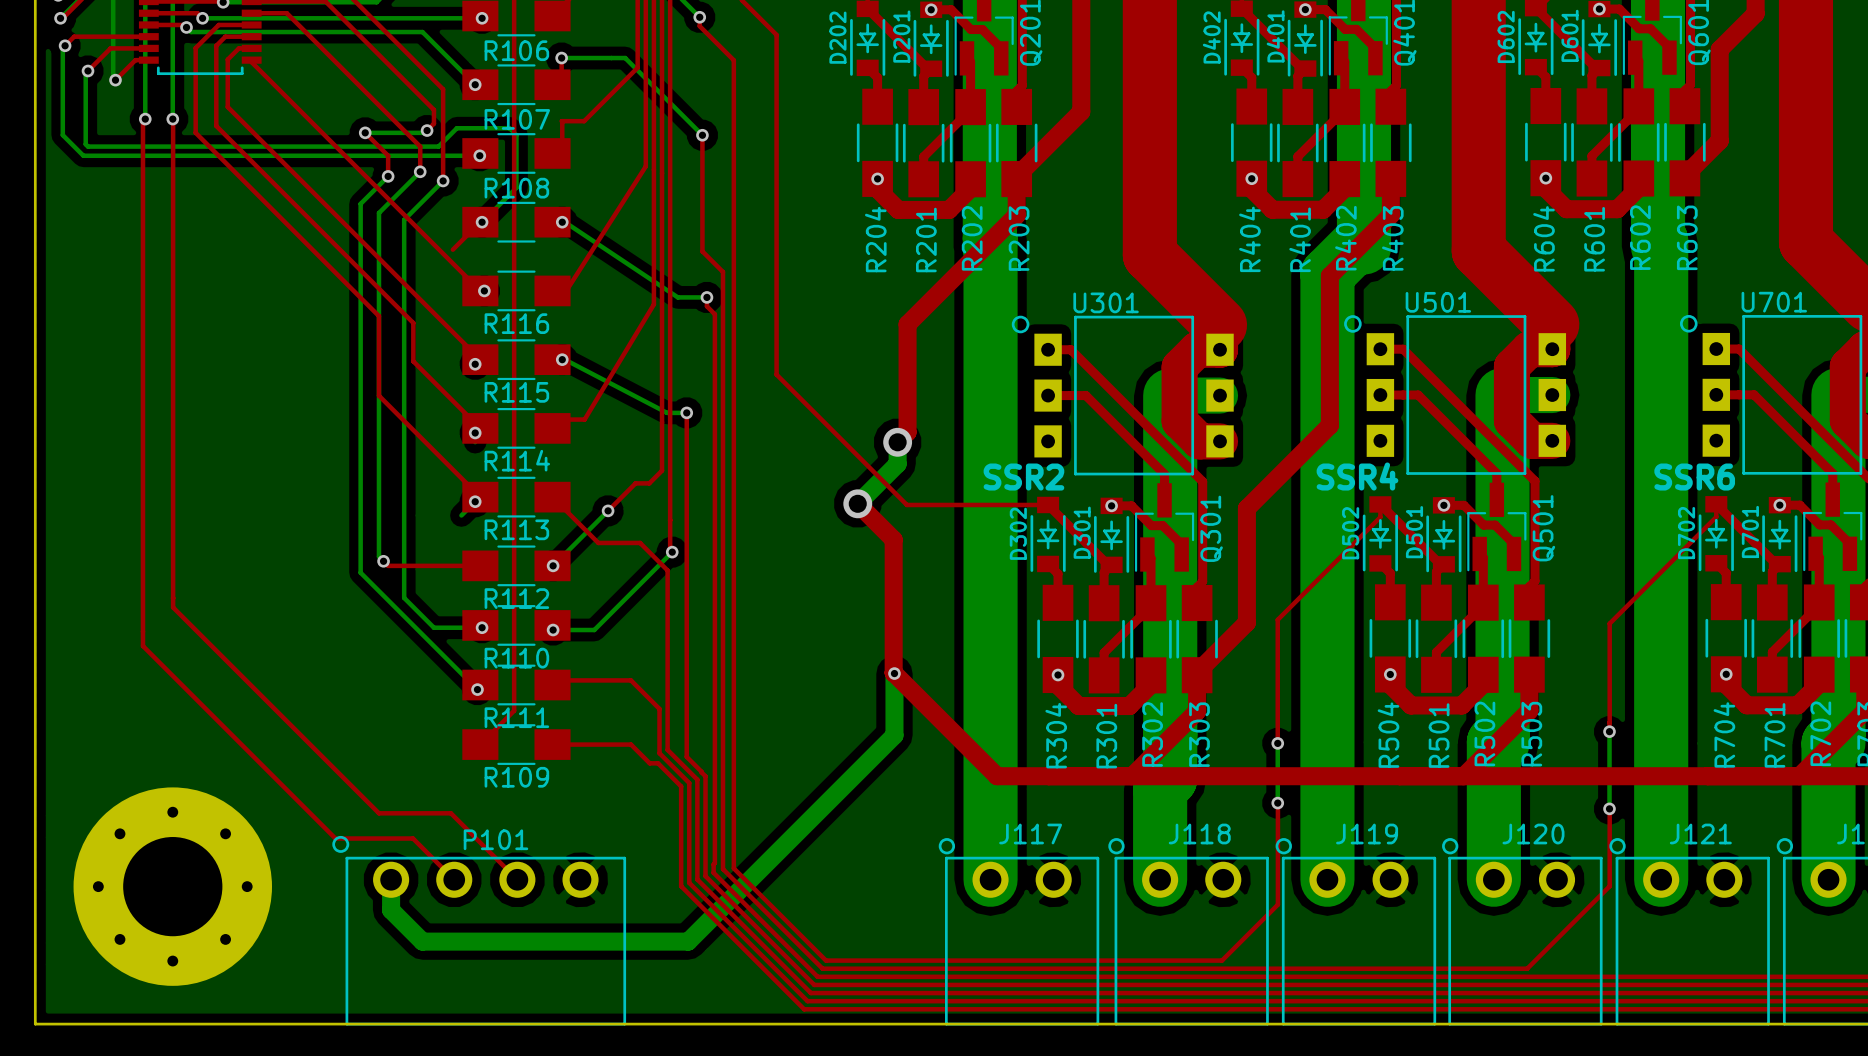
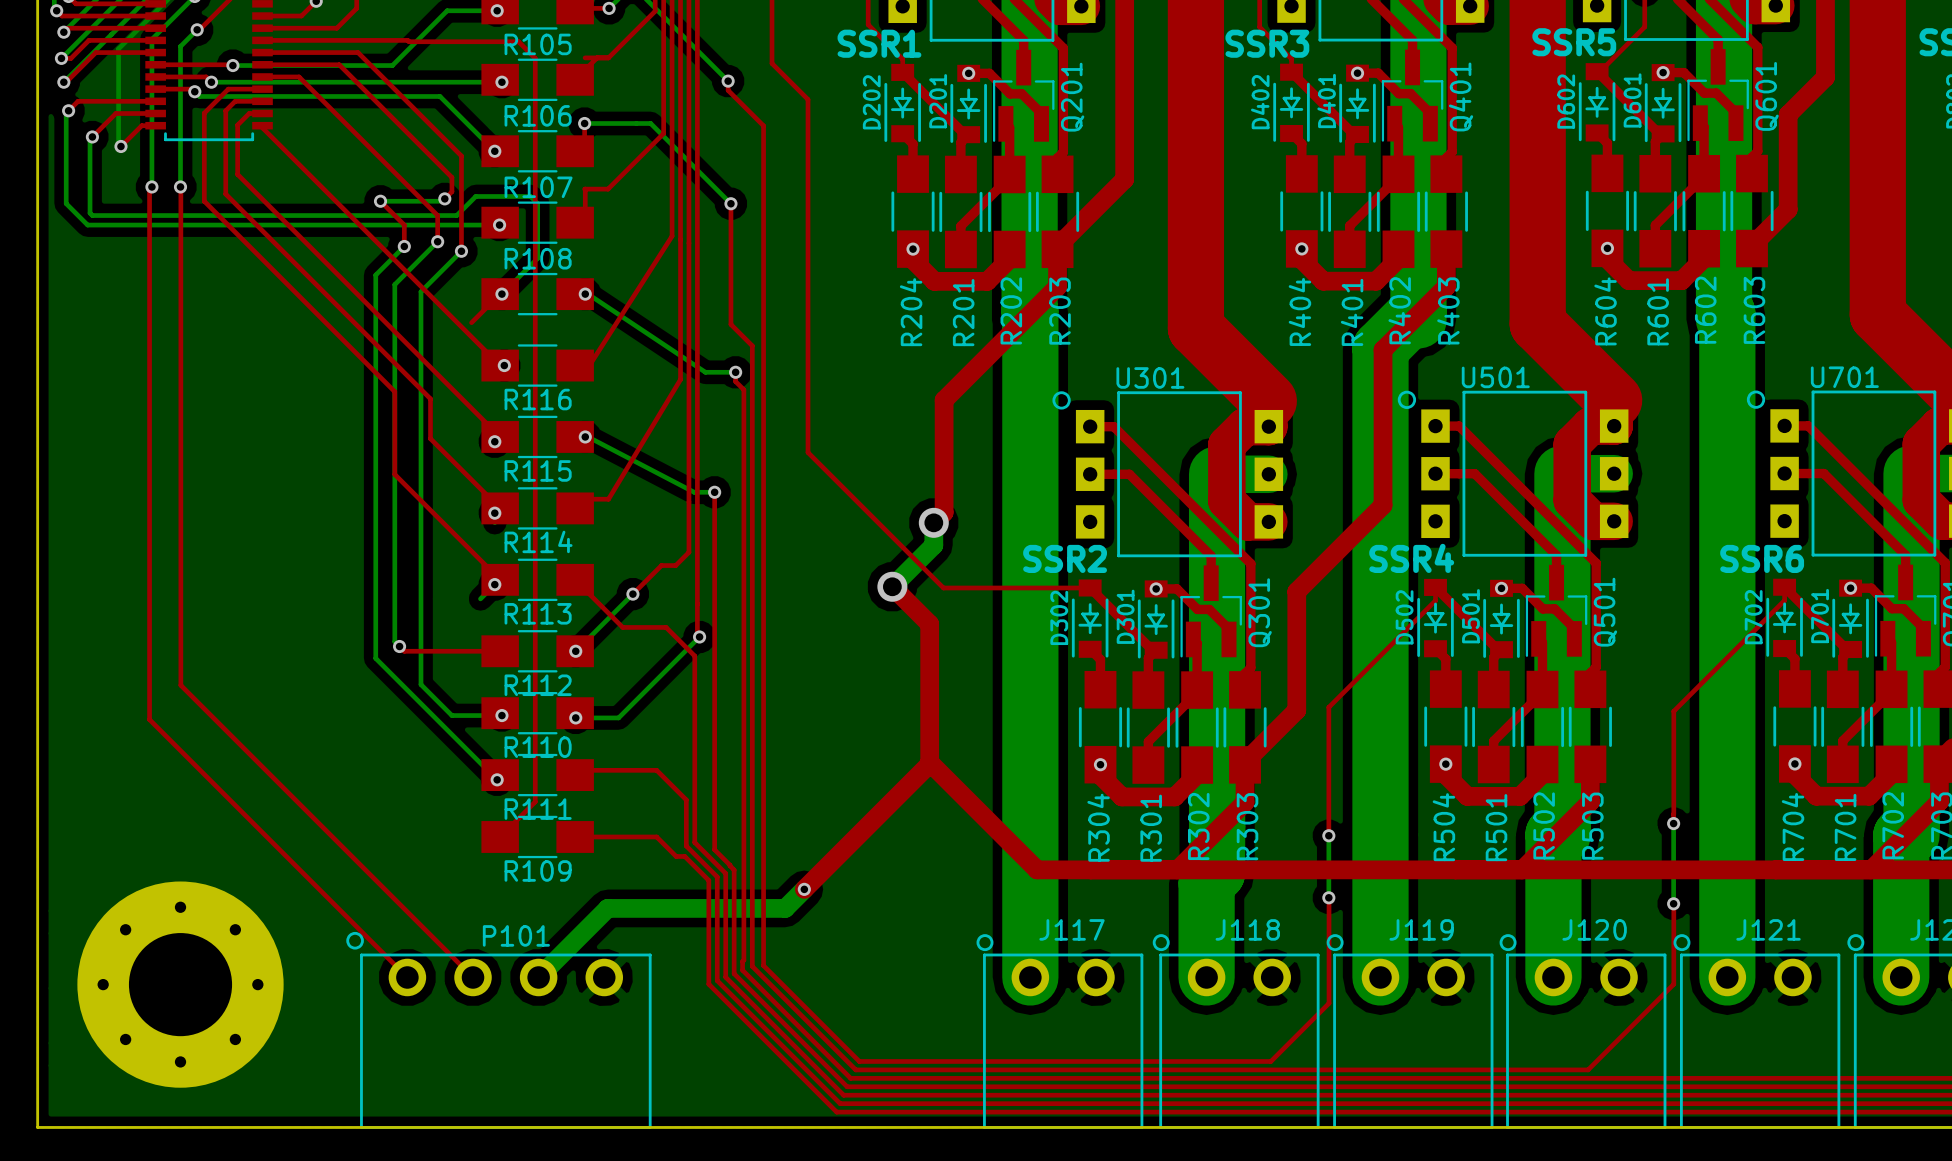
top track: (173, 598) (173, 607) (378, 813) (450, 813) (517, 879) -> none
top track: (142, 631) (142, 646) (335, 838) (412, 838) -> (180, 685) (430, 934)
top track: none -> (149, 719) (407, 977)
top track: none -> (929, 762) (804, 889)
bottom track: (894, 673) (894, 735) (688, 941) (422, 941) (391, 910) (391, 879) -> none
via: (894, 673) -> none
bottom track: none -> (804, 889) (785, 908) (607, 908) (538, 977)
via: none -> (804, 889)

